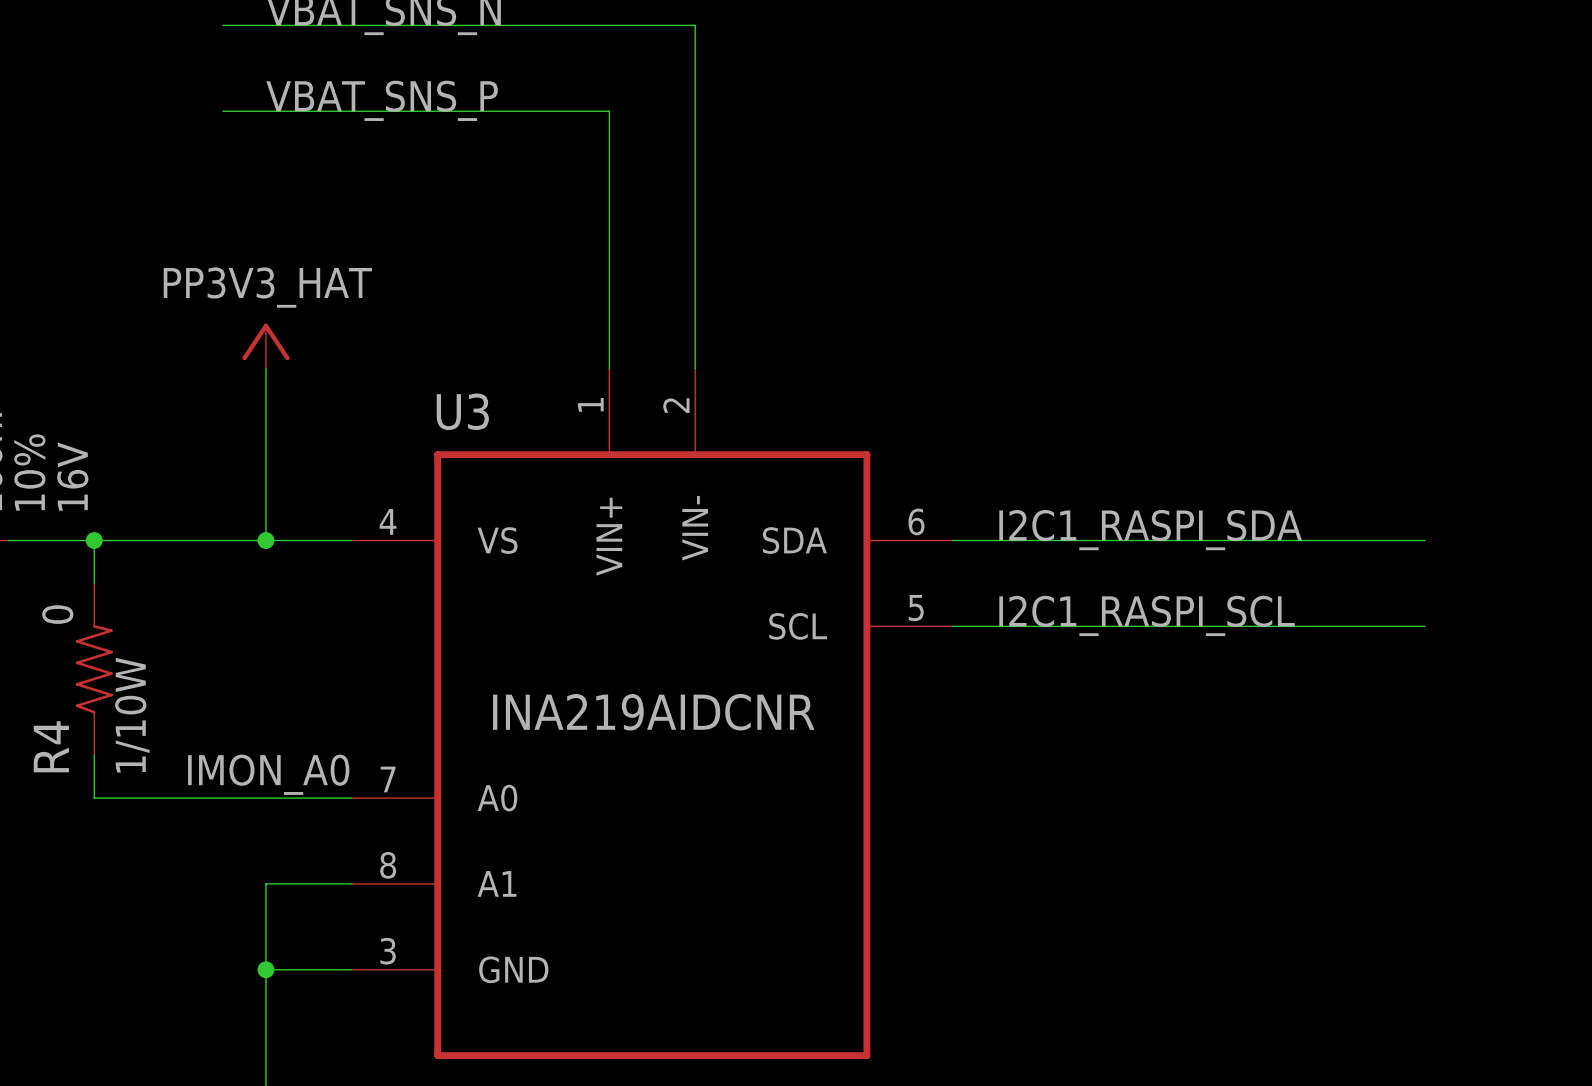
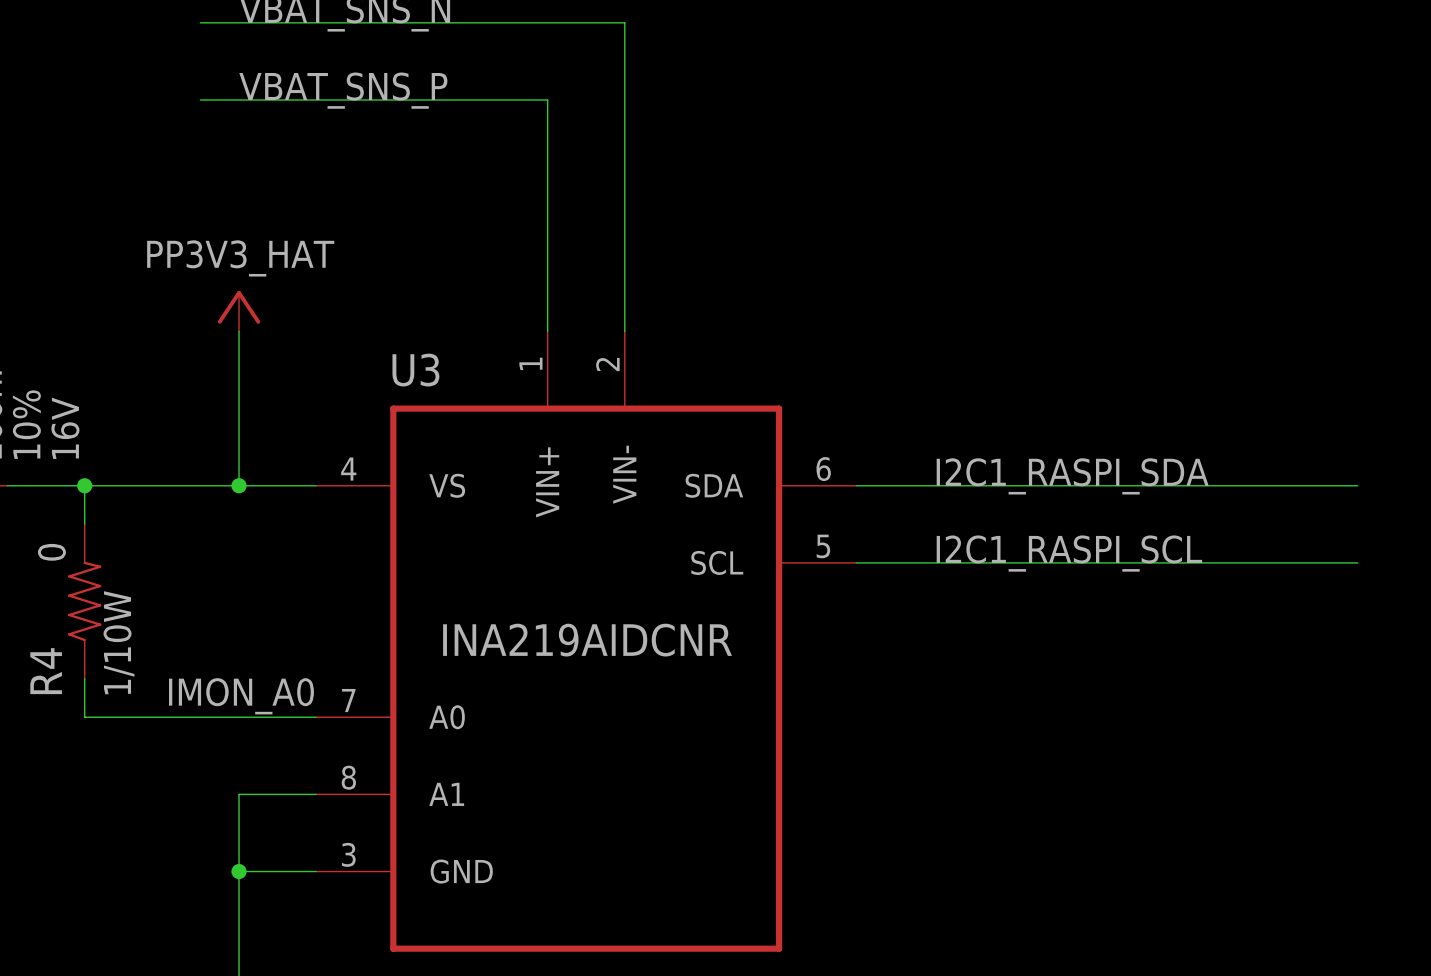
label position: I2C1_RASPI_SDA (1150, 530) -> I2C1_RASPI_SDA (1072, 476)
wire: none -> (1280, 485) (1357, 485)
label position: I2C1_RASPI_SCL (1147, 615) -> I2C1_RASPI_SCL (1069, 553)
wire: none -> (1280, 562) (1357, 562)

